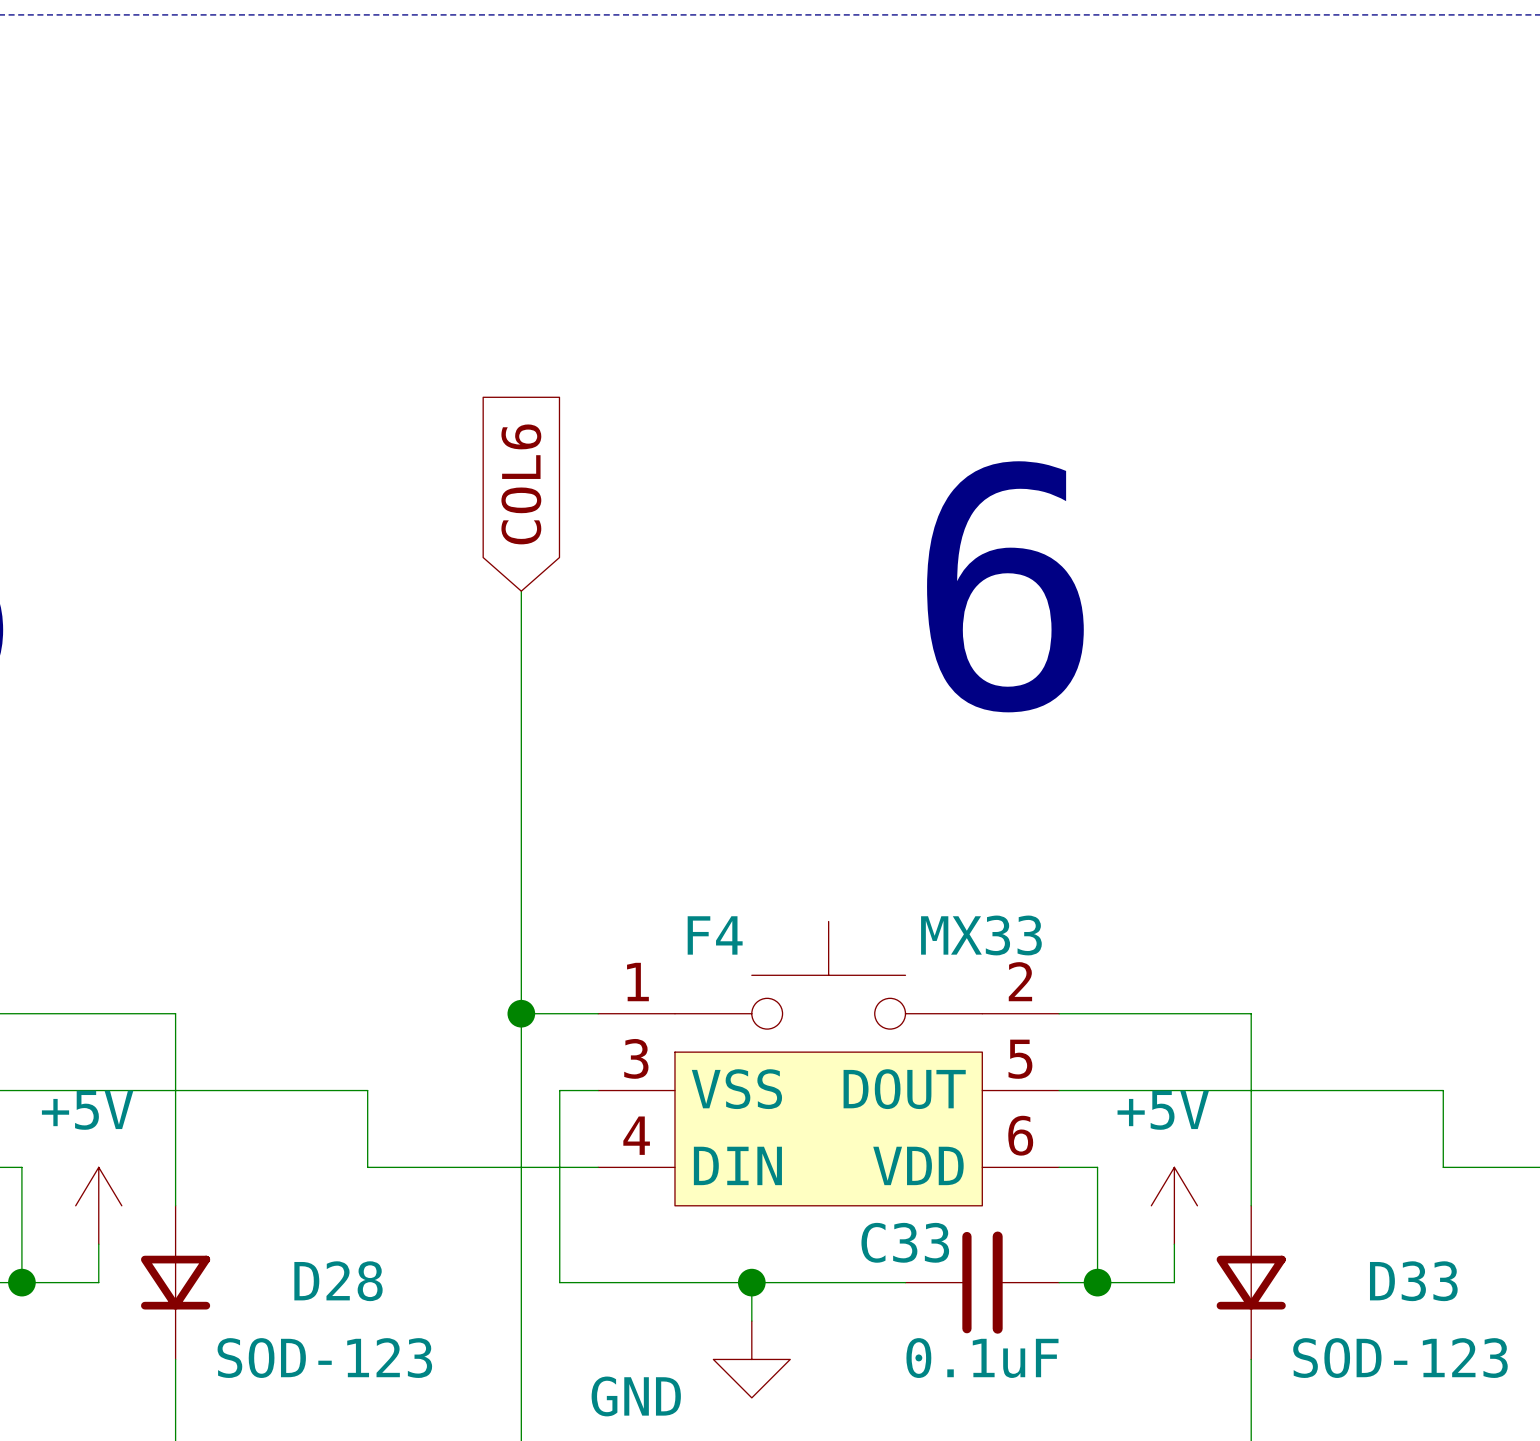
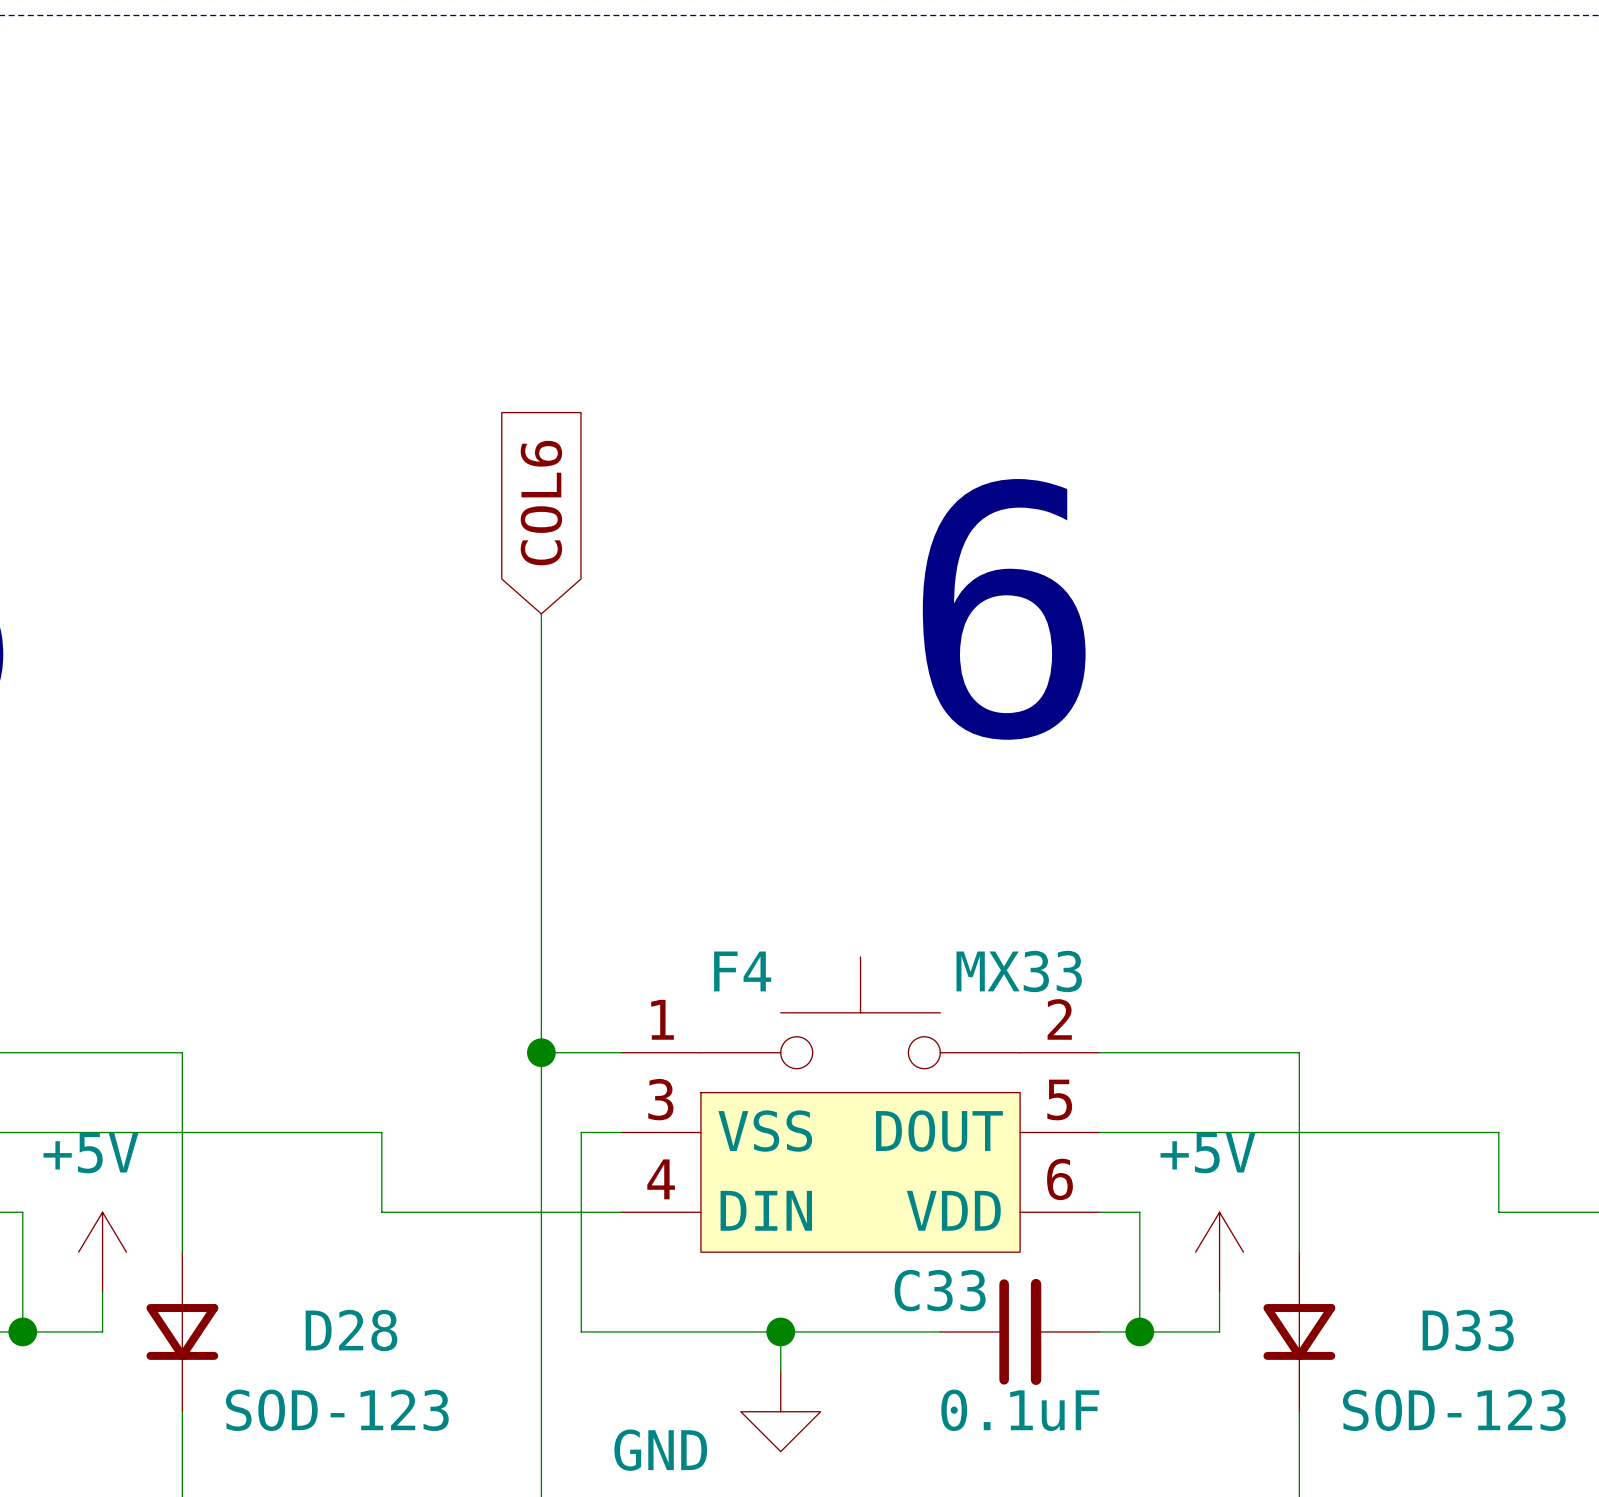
text position: 6 (1005, 586) -> 6 (1004, 609)

